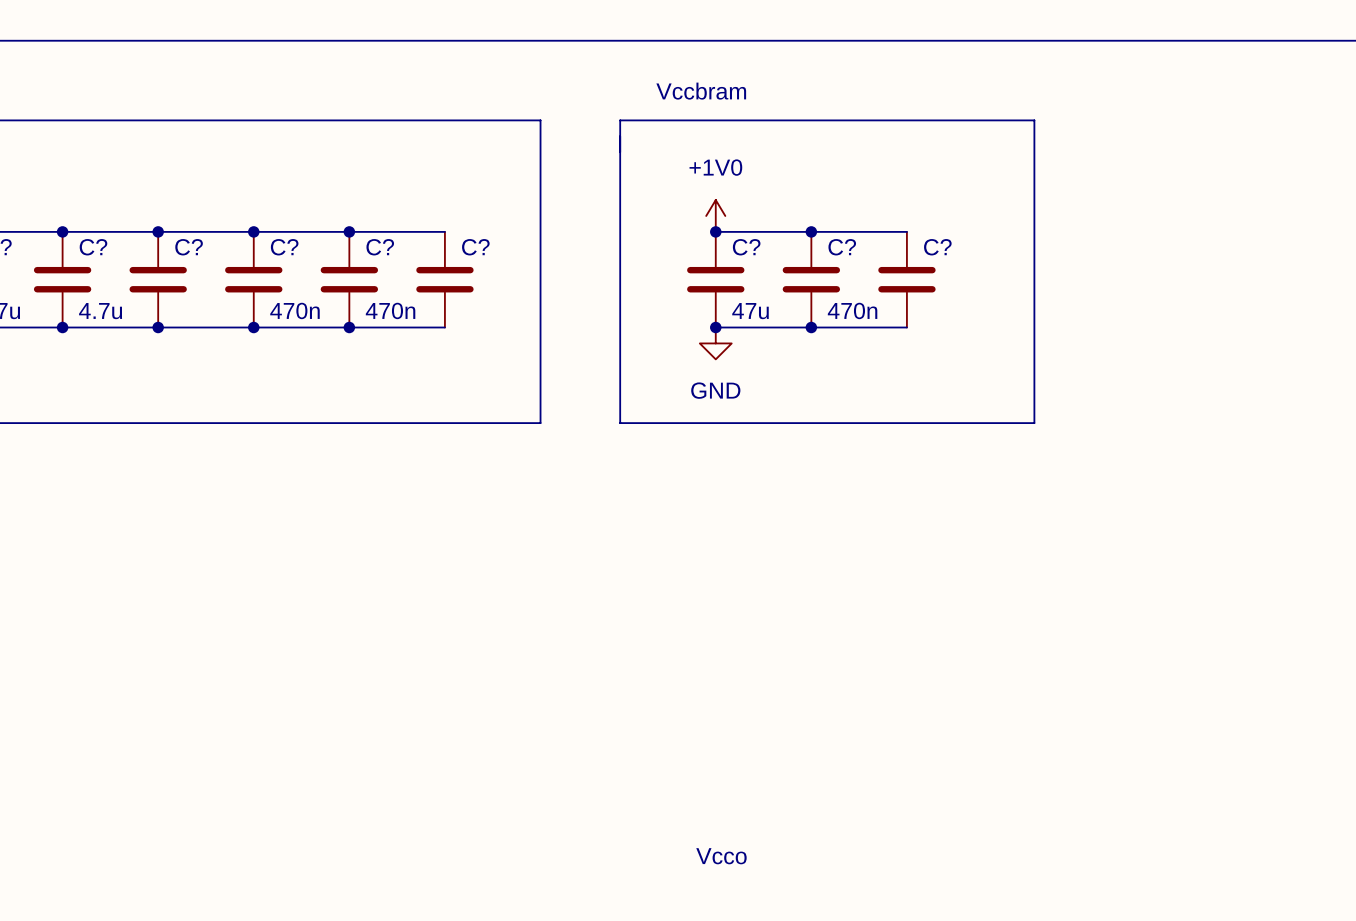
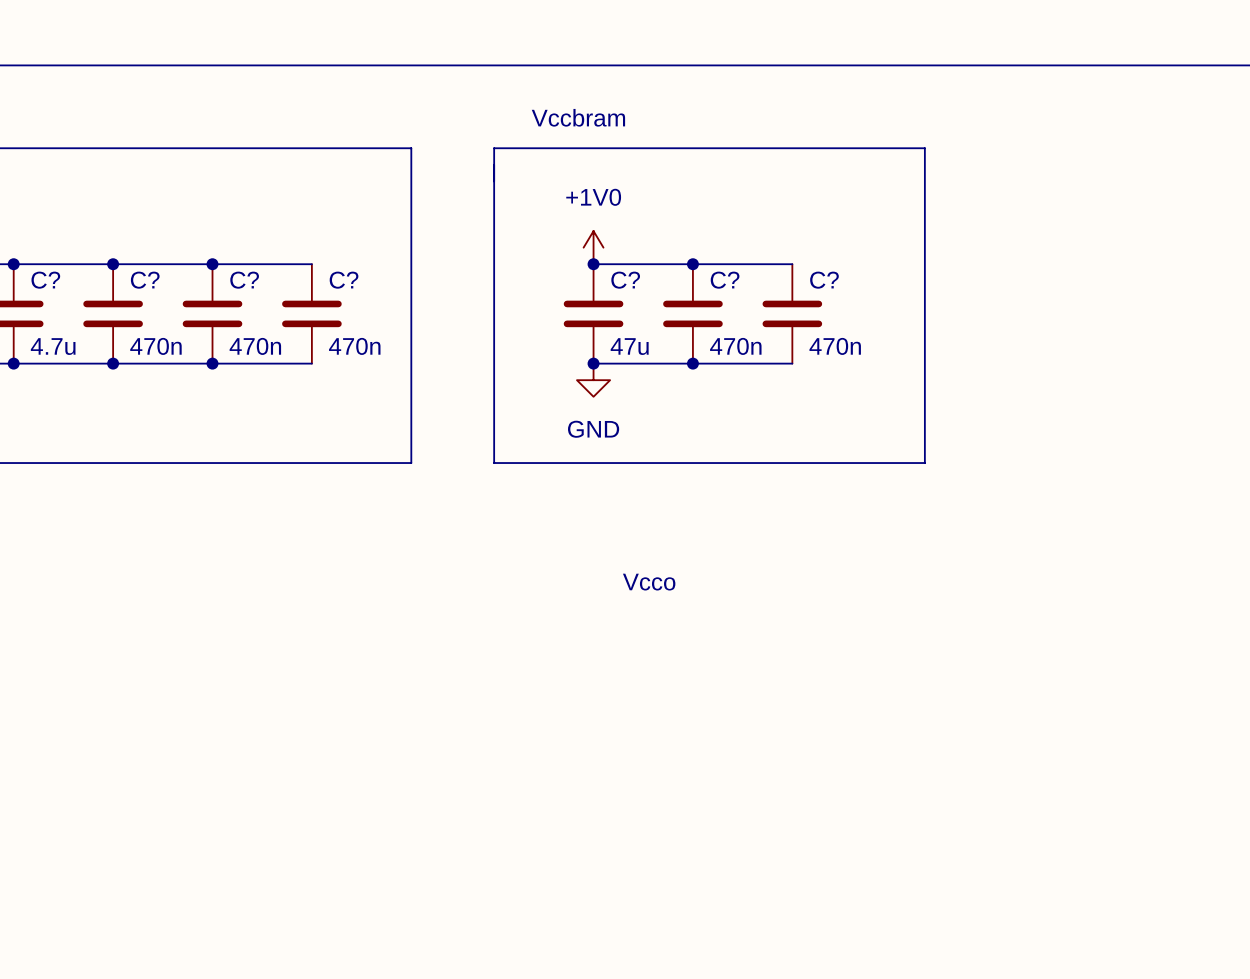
C? value: none -> 470n (354, 346)
C? value: none -> 470n (835, 346)
C? value: none -> 4.7u (53, 346)
text: none -> Vcco (649, 582)
text: Vcco (721, 856) -> none

